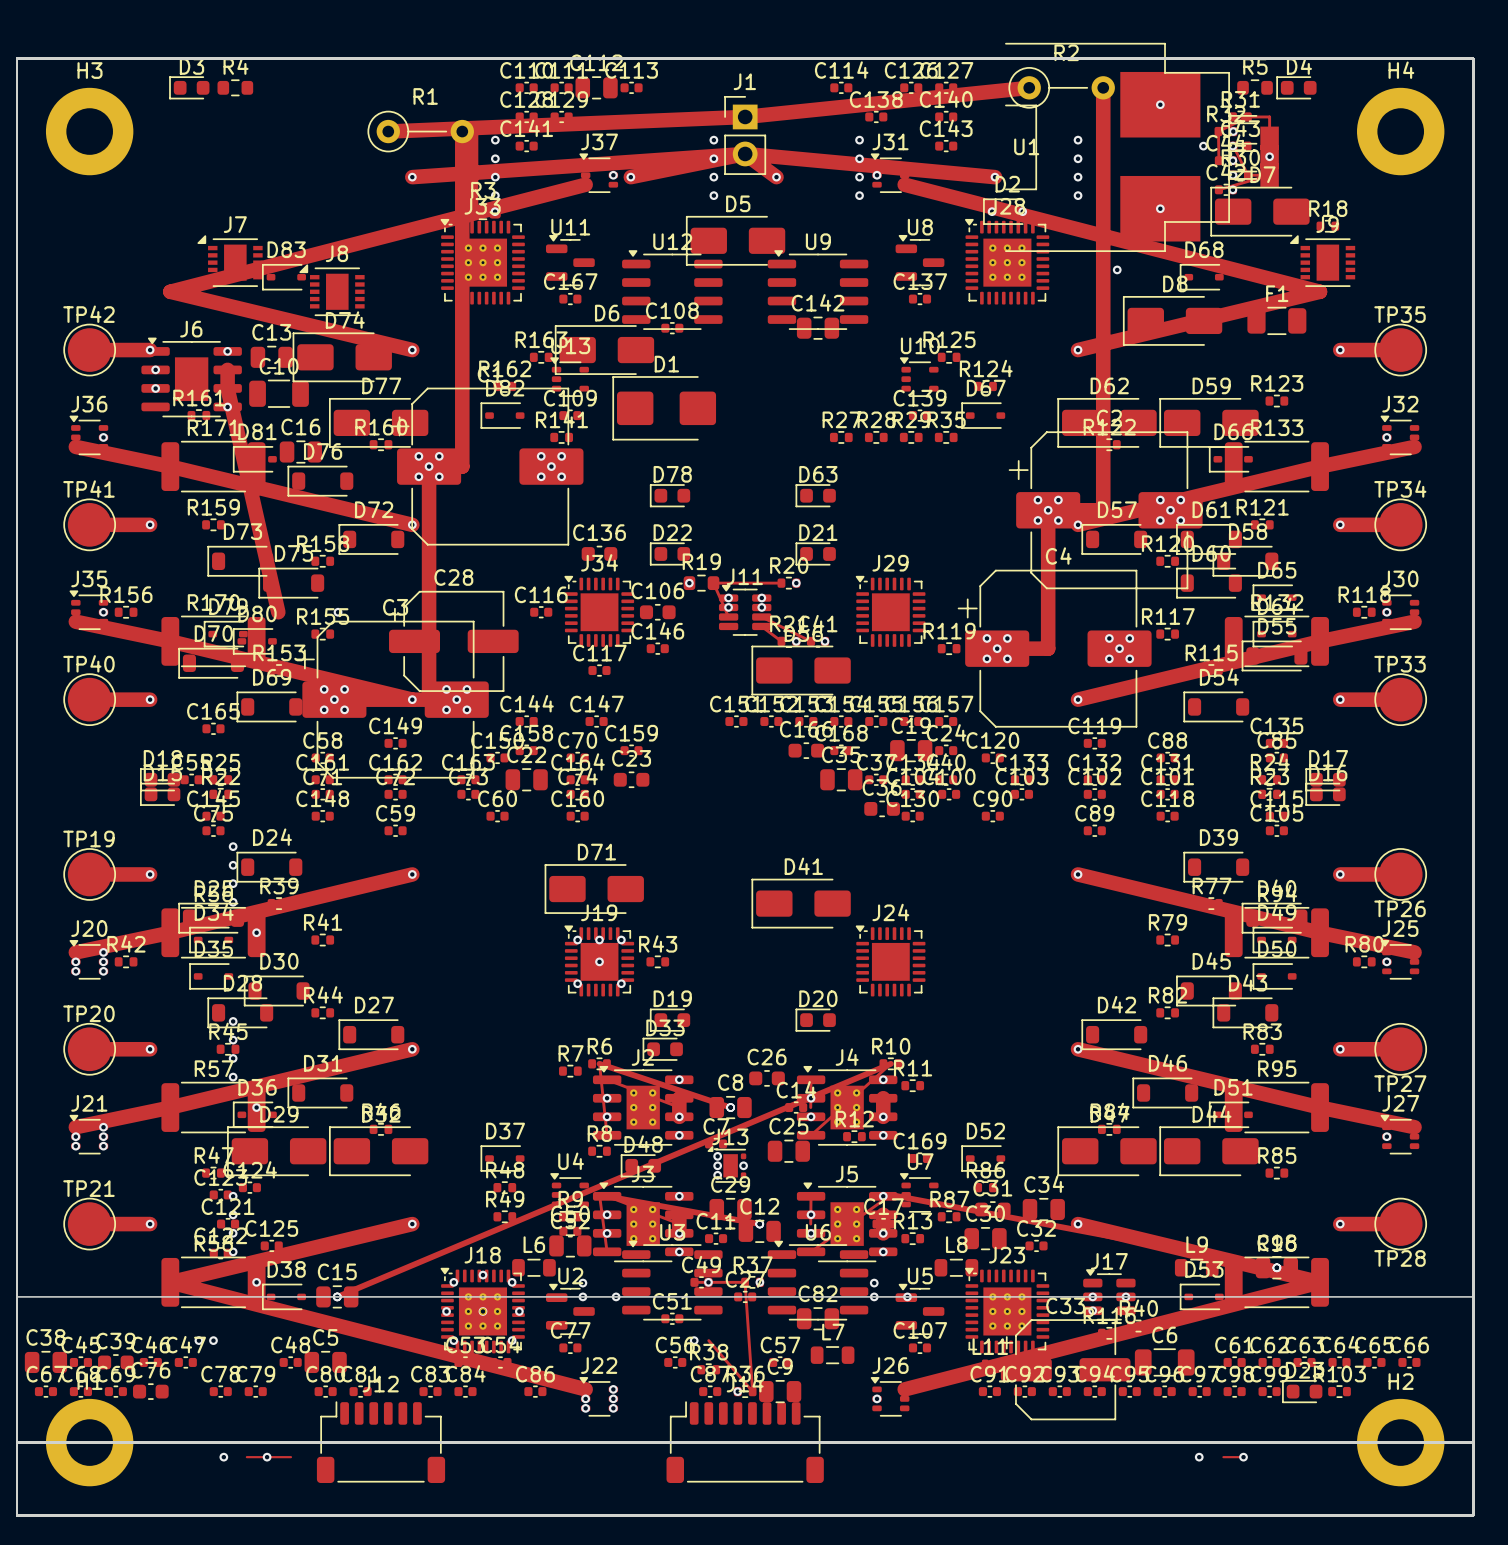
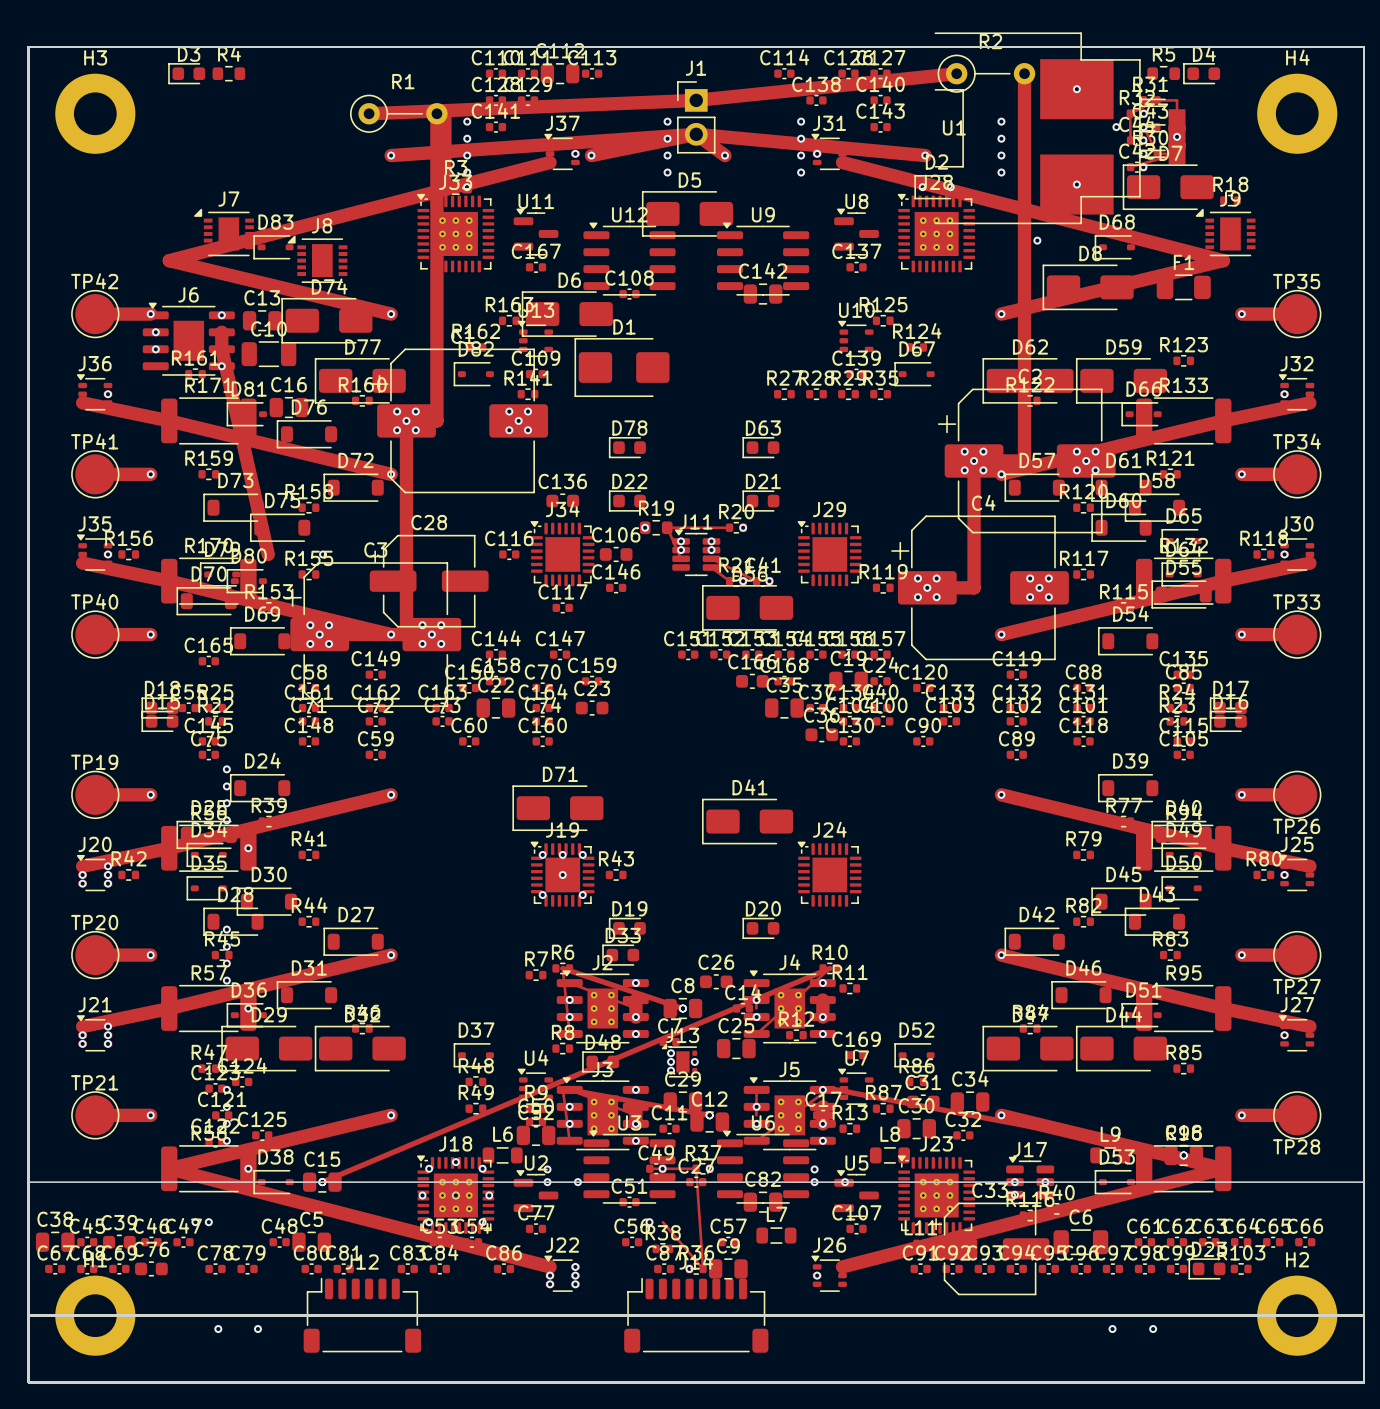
track: (246, 1457) (290, 1457) -> none
track: (1223, 1457) (1243, 1457) -> none

